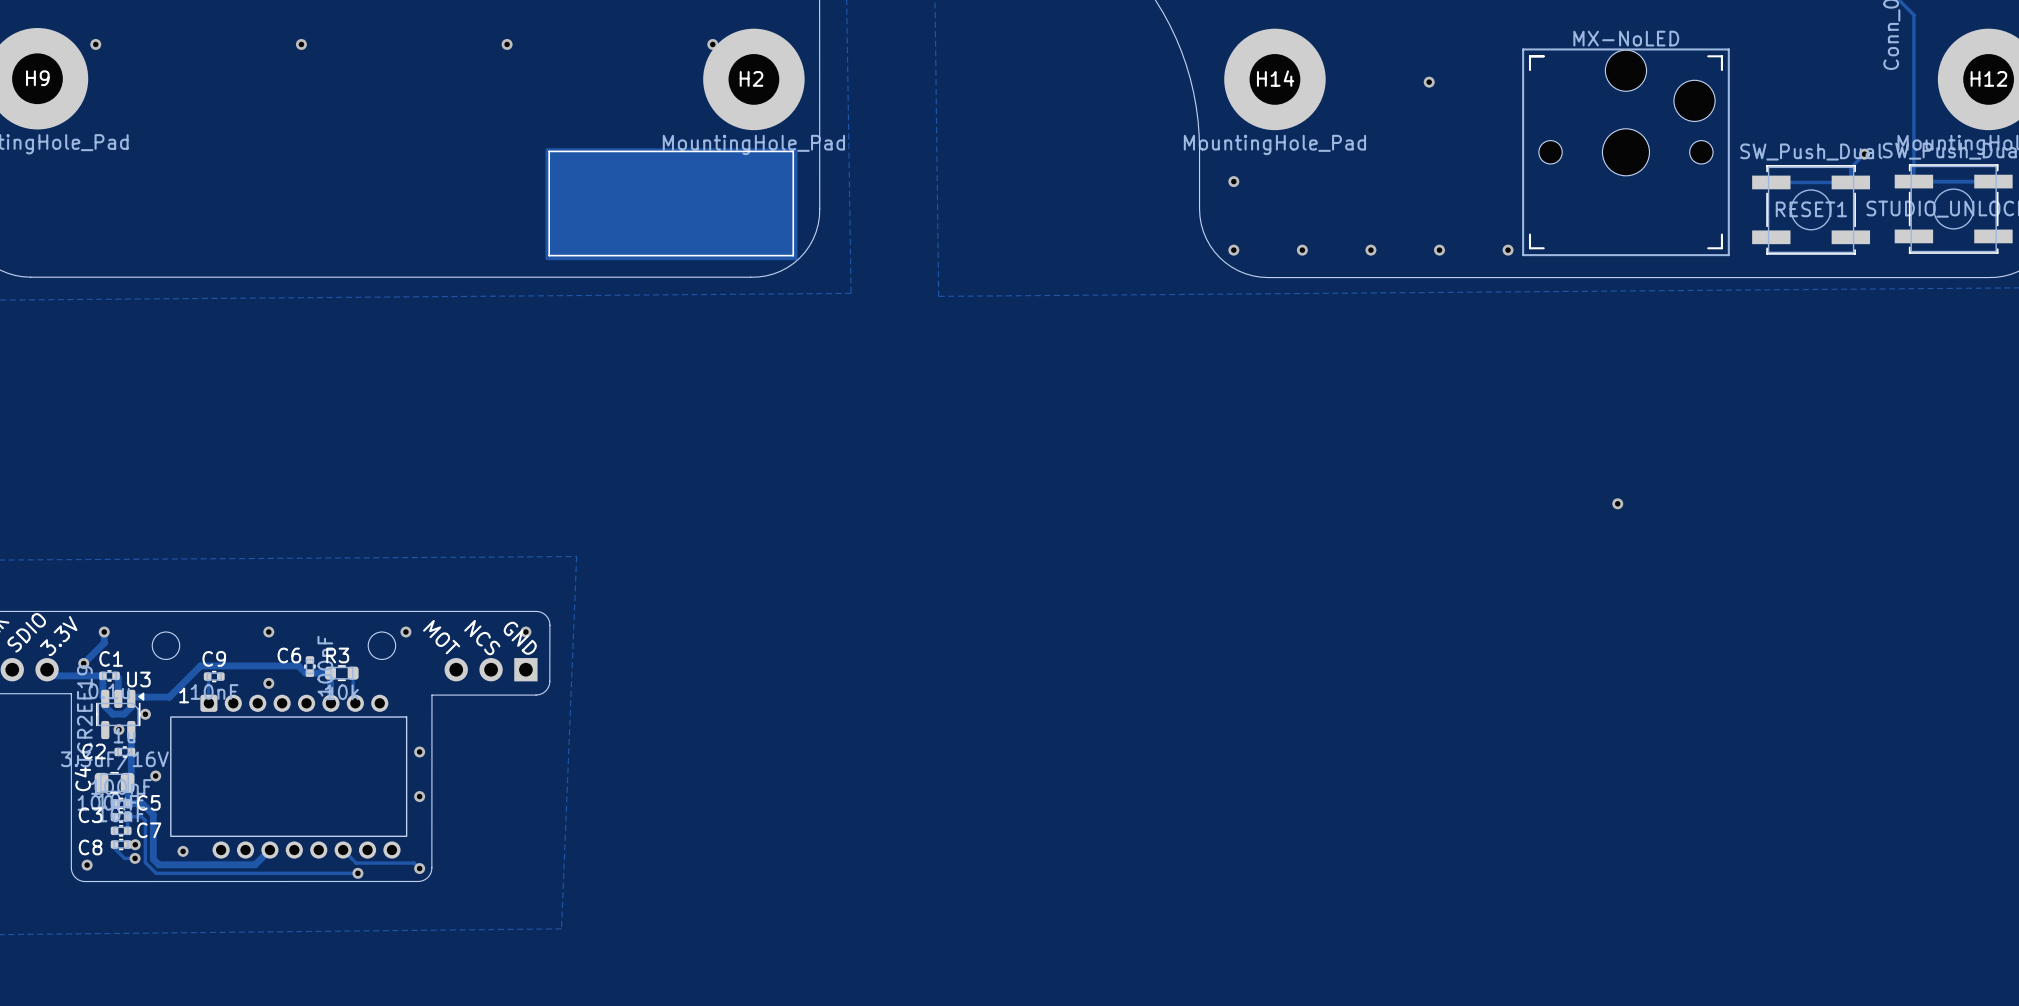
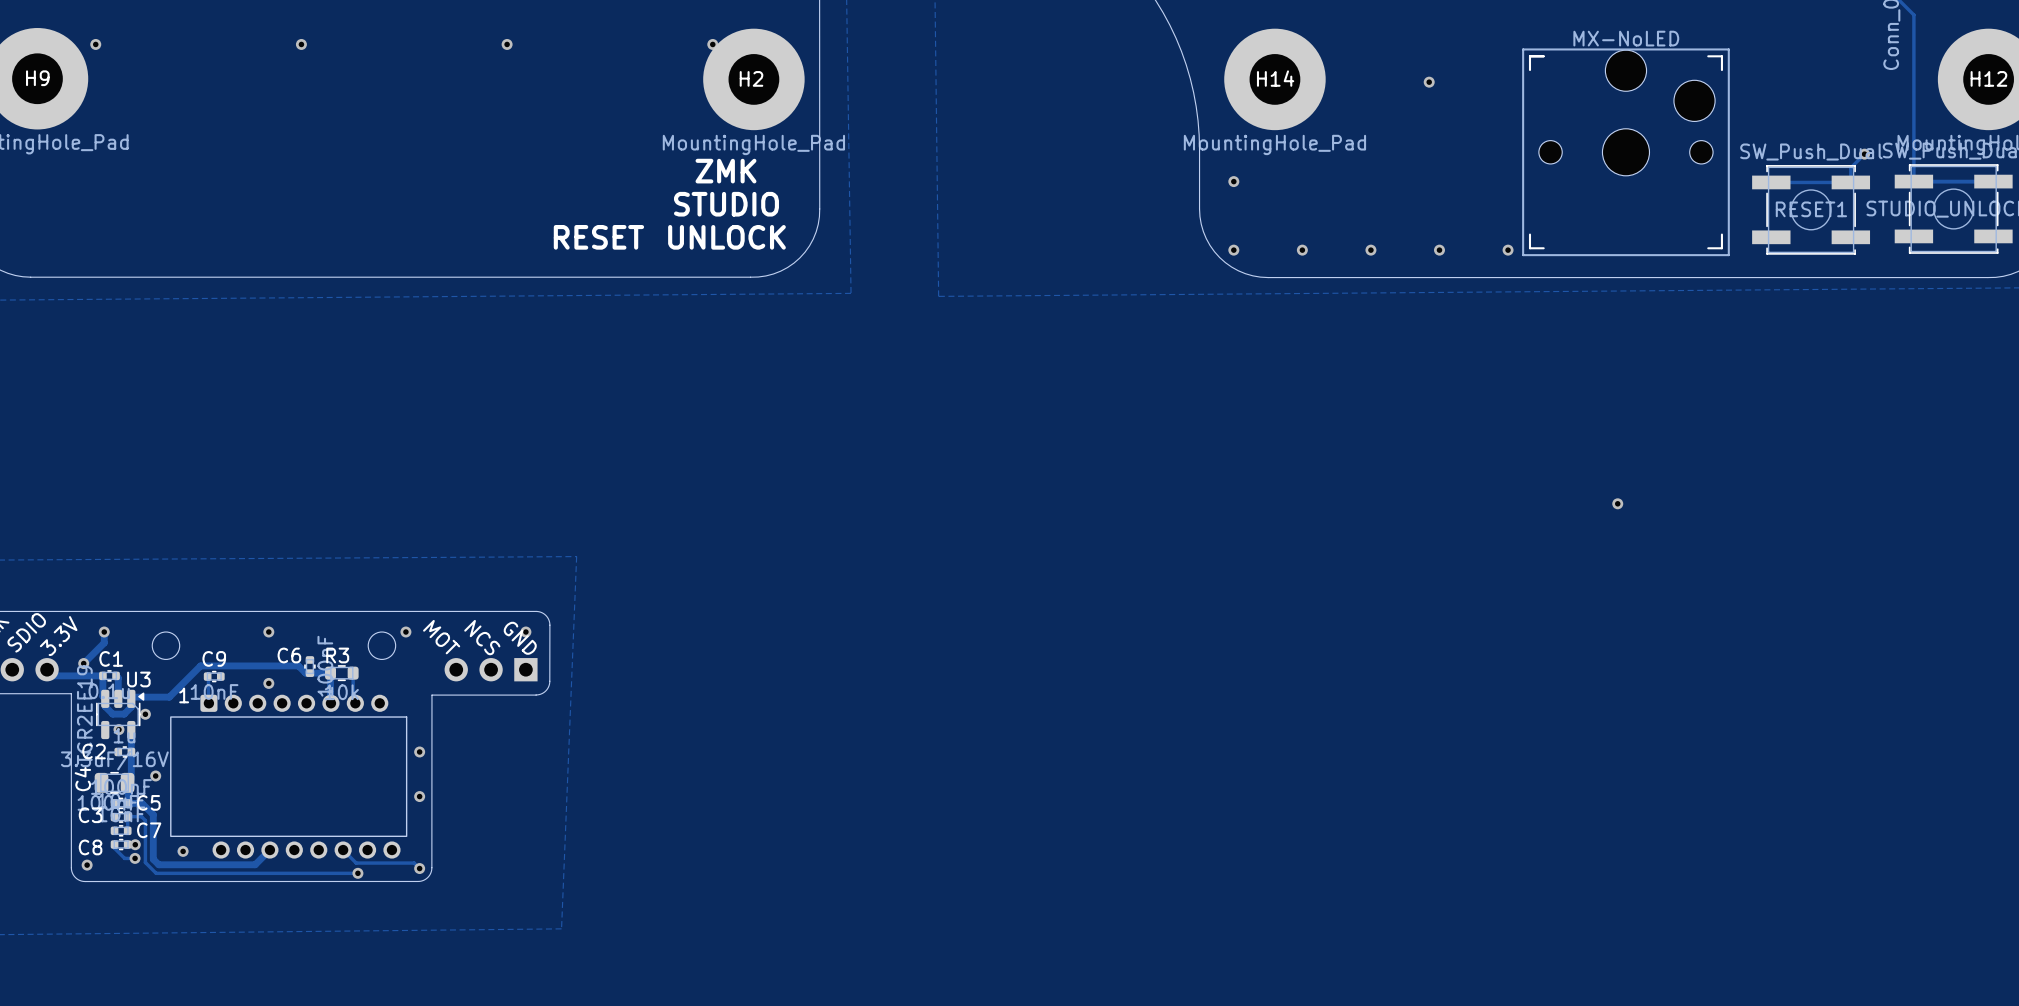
drawing: [545, 148, 798, 261] -> none
line: (549, 151) (793, 151) (793, 255) (549, 255) (549, 151) -> none
text: none -> ZMK (725, 171)
text: none -> STUDIO (726, 204)
text: none -> RESET (598, 237)
text: none -> UNLOCK (726, 237)

